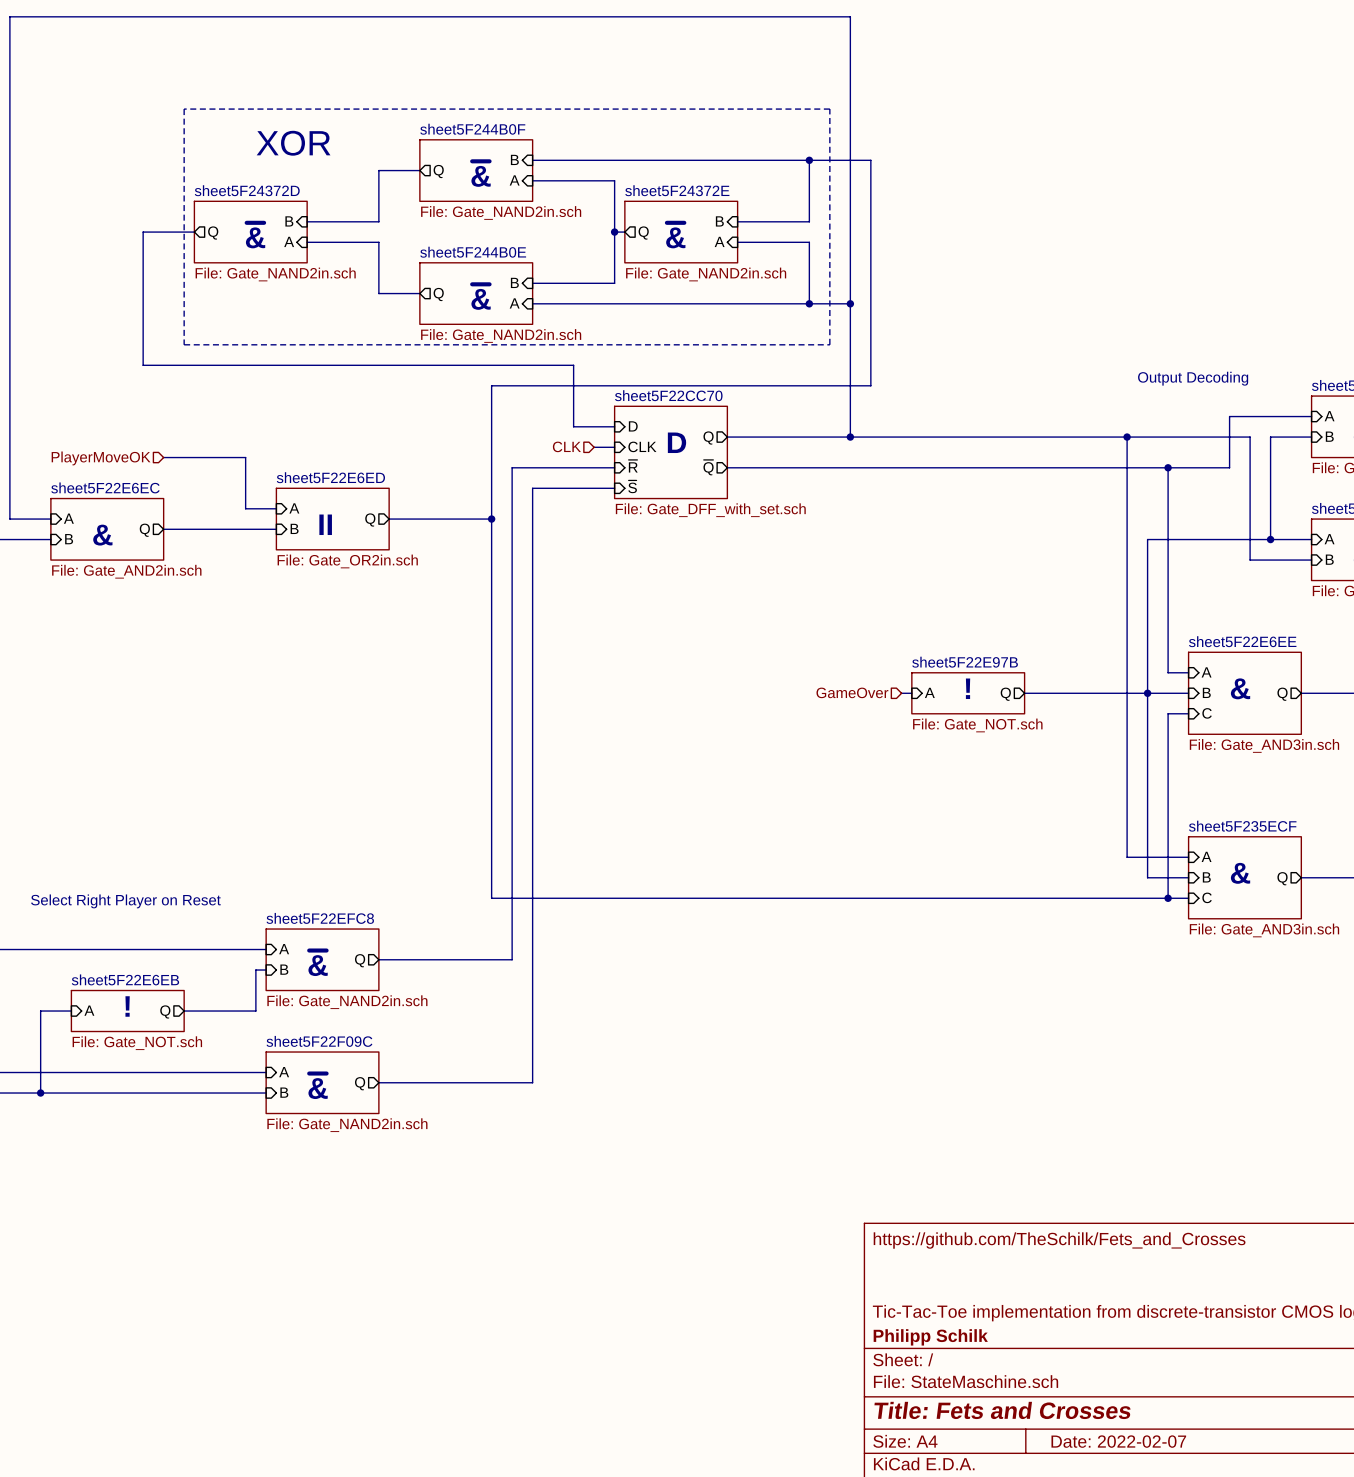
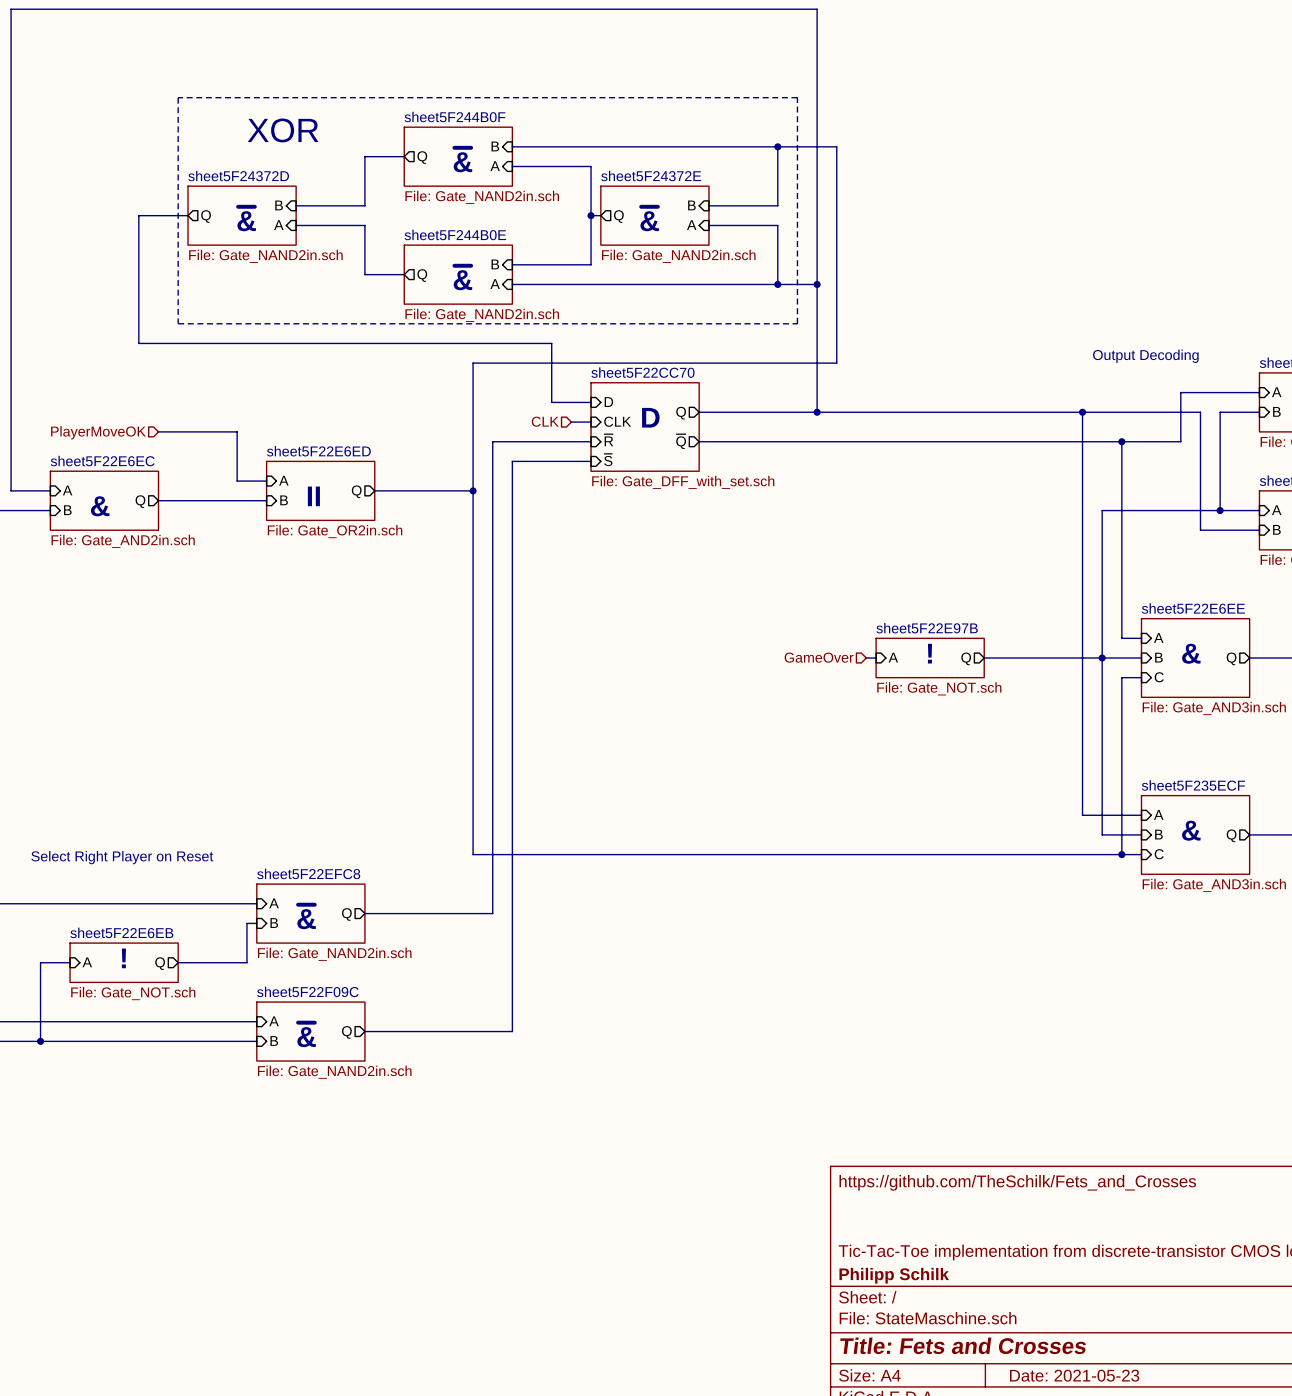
title block: Date: 2022-02-07 (1118, 1441) -> Date: 2021-05-23 (1074, 1375)

